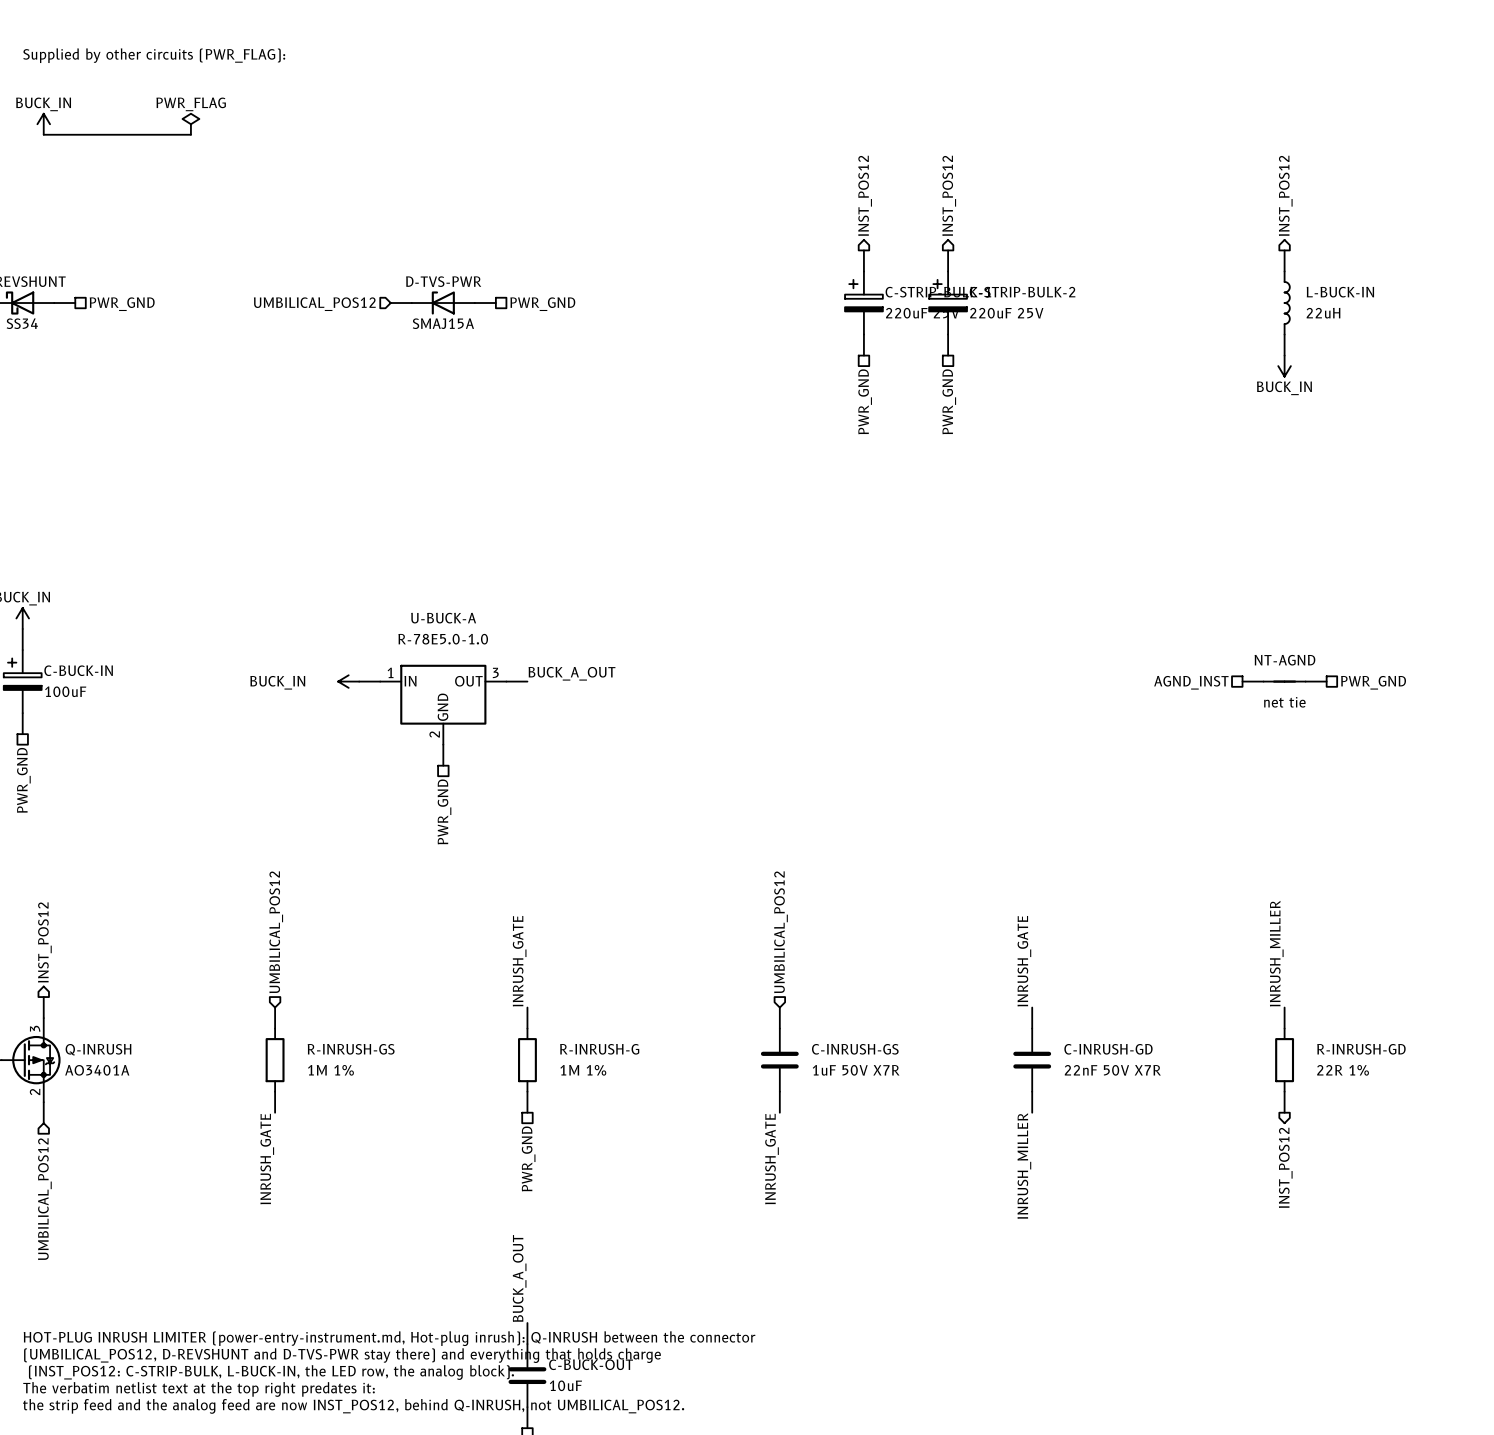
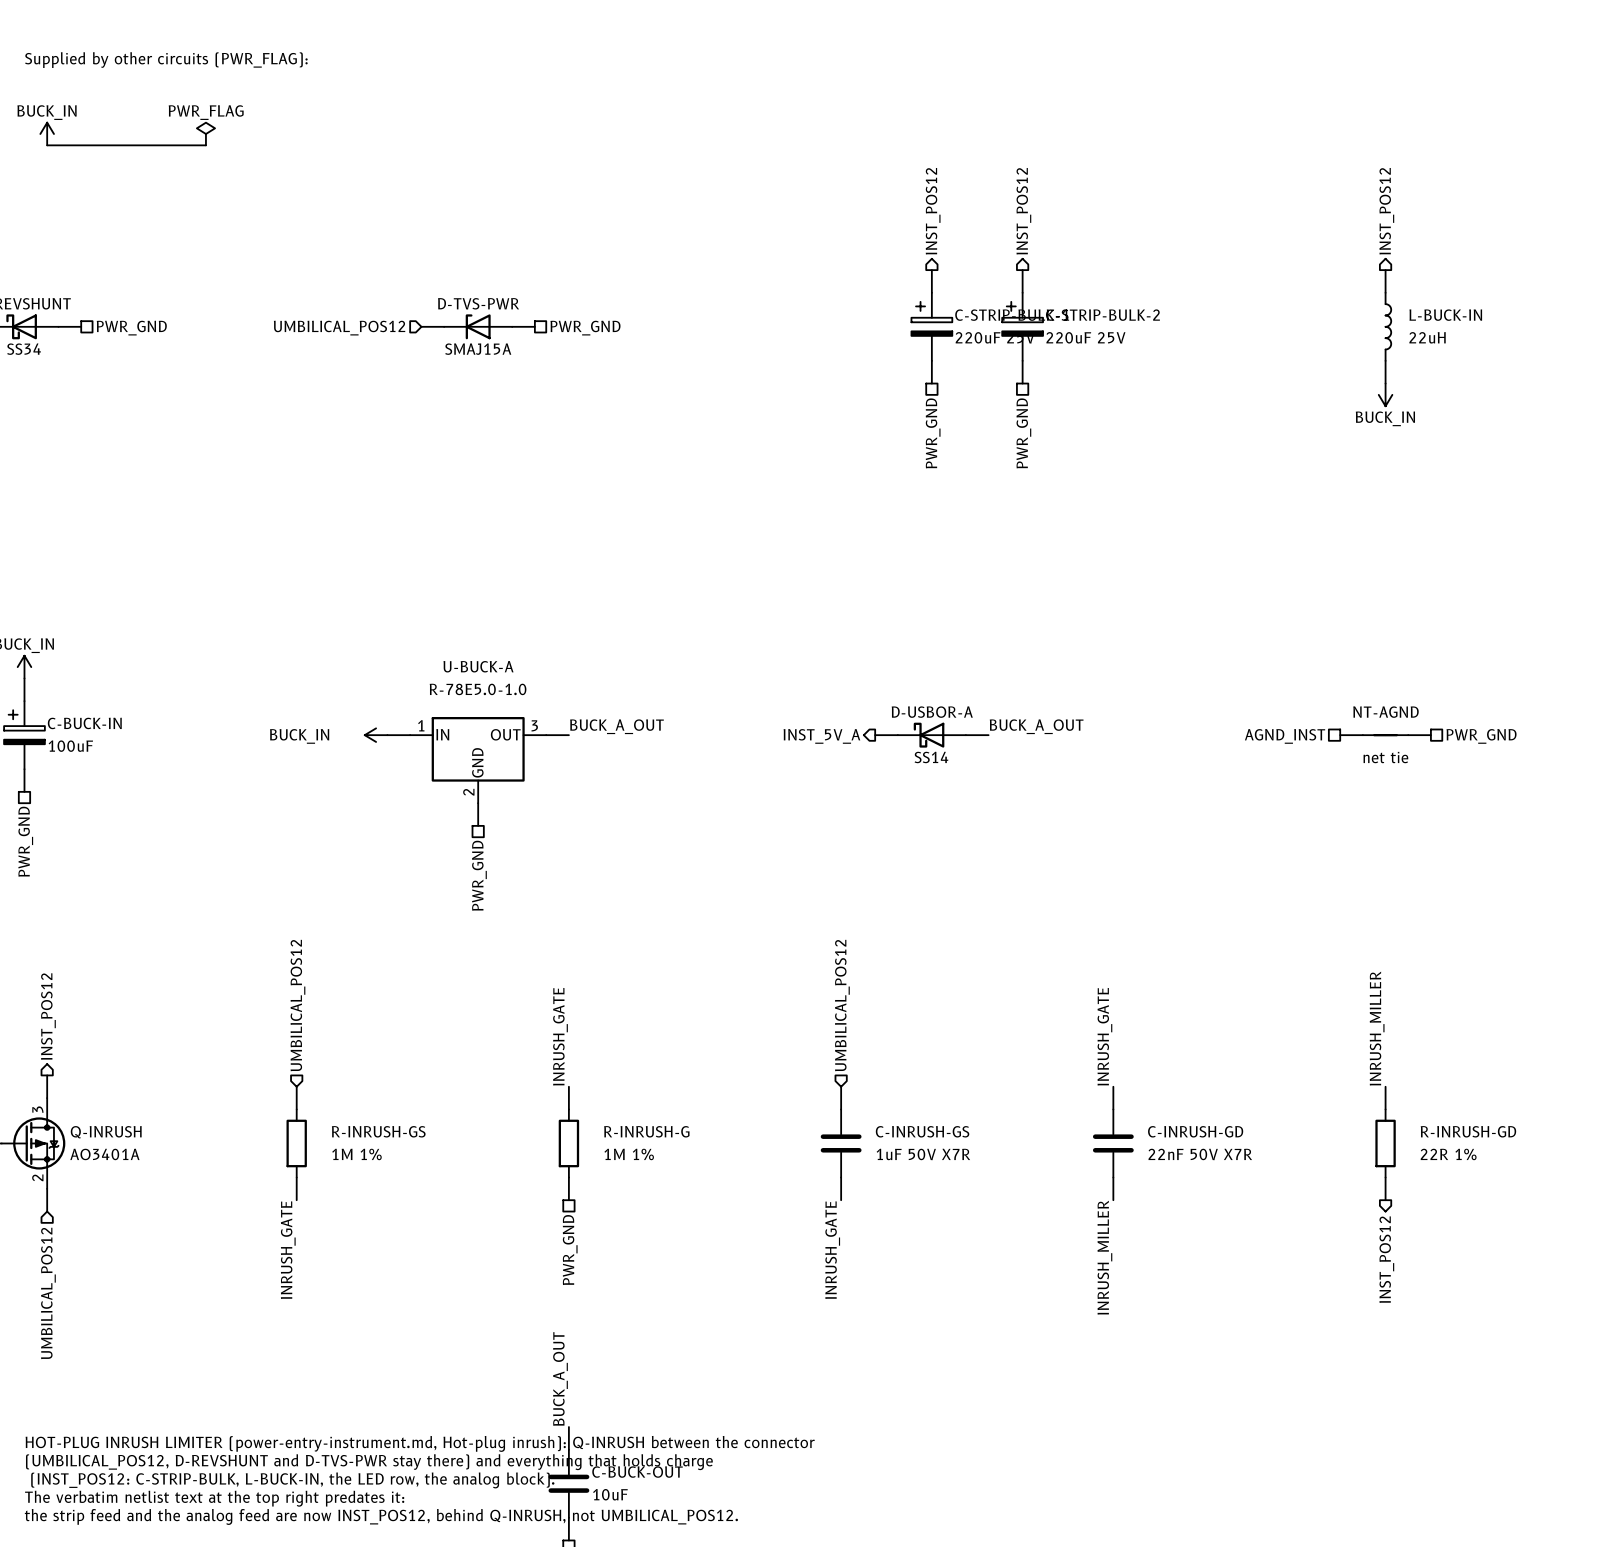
label: none -> BUCK_A_OUT (1036, 726)
wire: none -> (875, 735) (897, 735)
D-USBOR-A: none -> SS14 (931, 735)
wire: none -> (965, 735) (988, 735)
hierarchical label: none -> INST_5V_A (821, 736)

